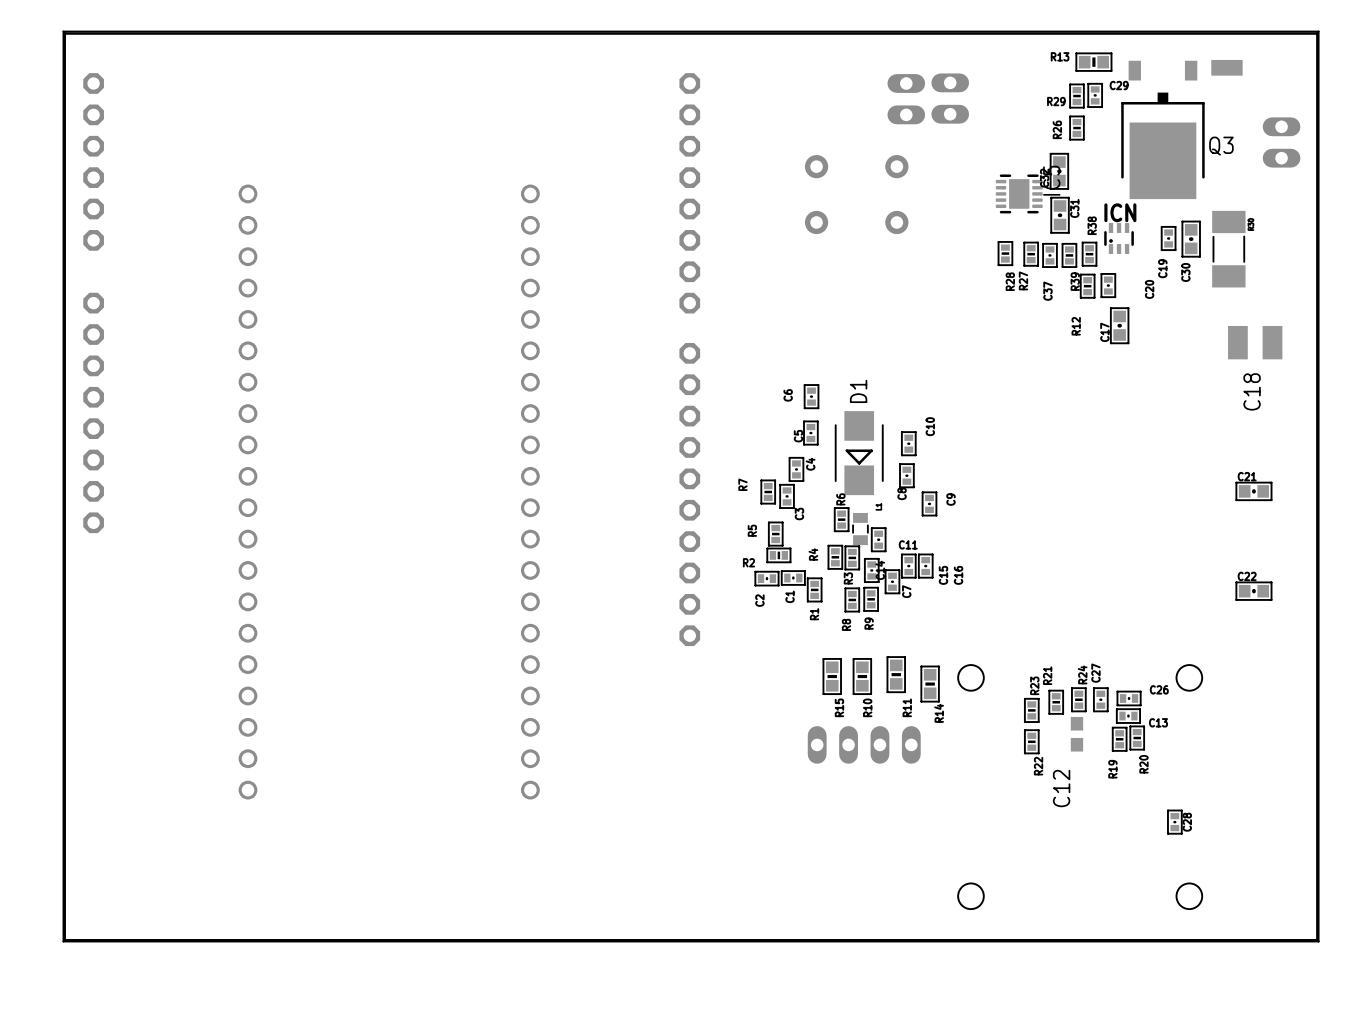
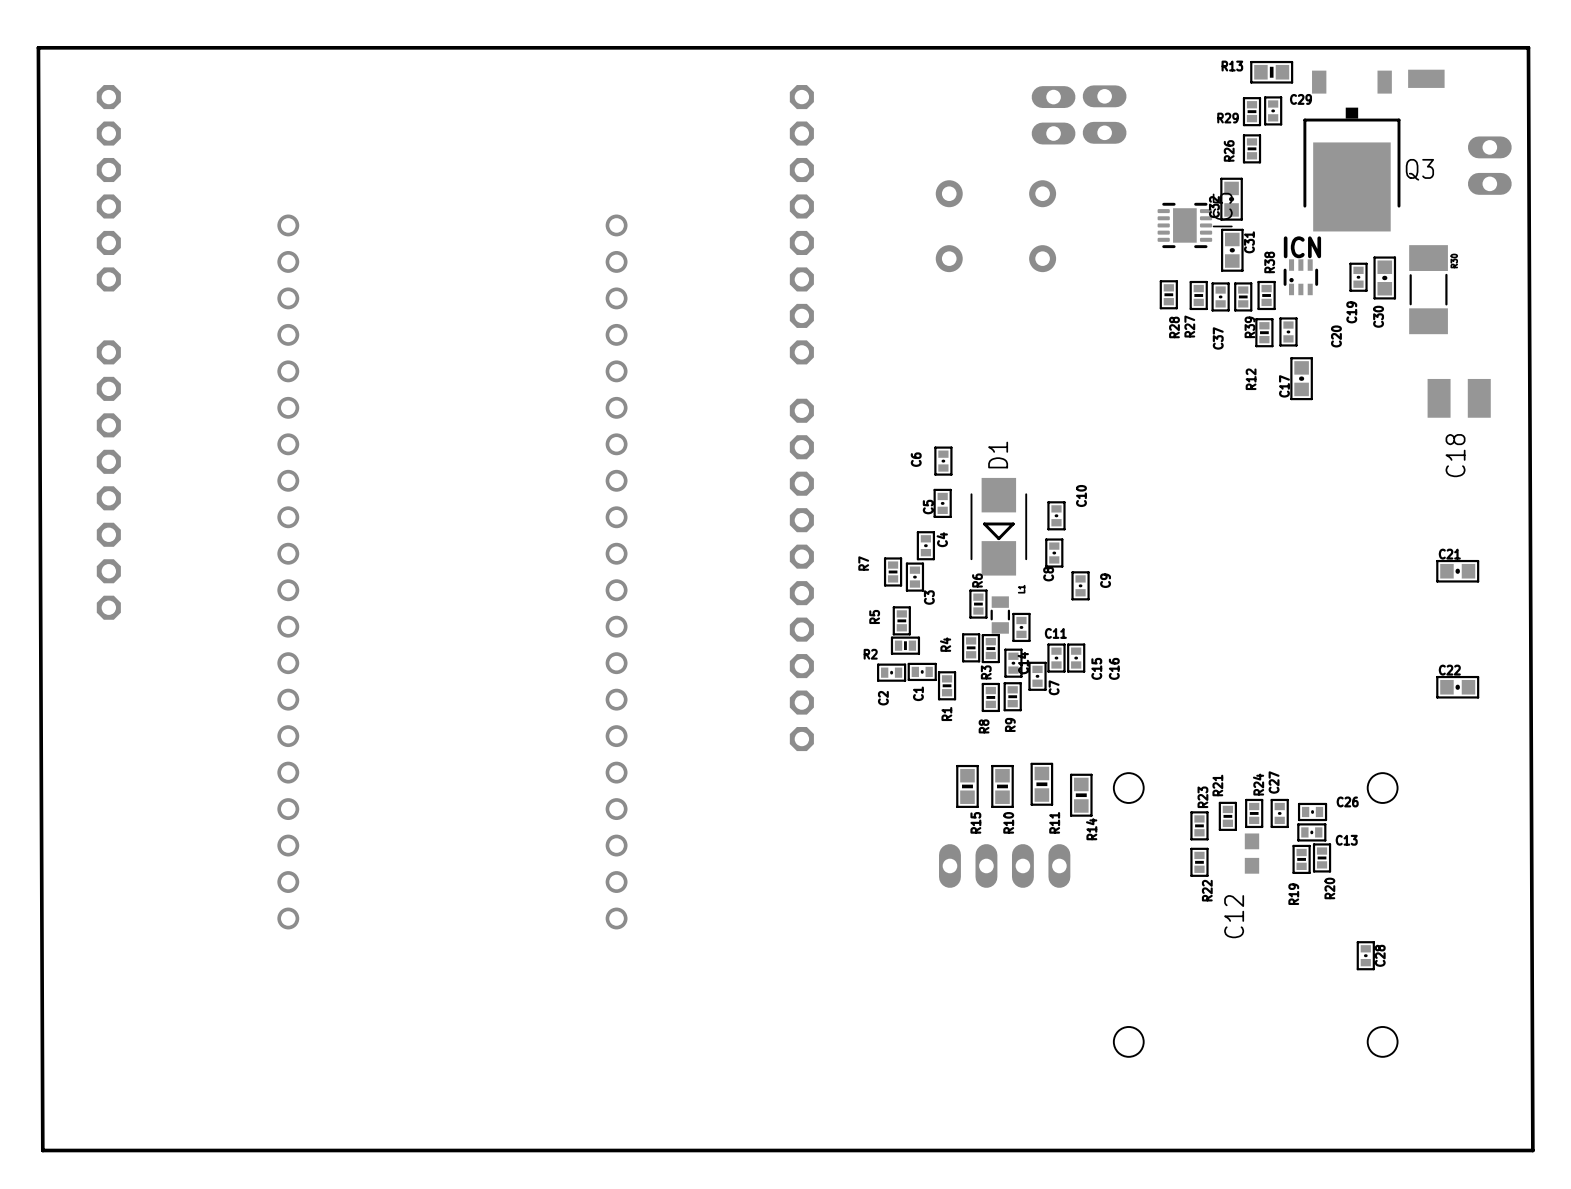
board edge: (1318, 31) (63, 31) (63, 941) (1318, 941) (1318, 31) -> (1528, 47) (1532, 1150) (42, 1150) (38, 47) (1528, 47)
line: (1317, 33) (64, 33) (64, 940) (1317, 940) (1317, 33) -> none

